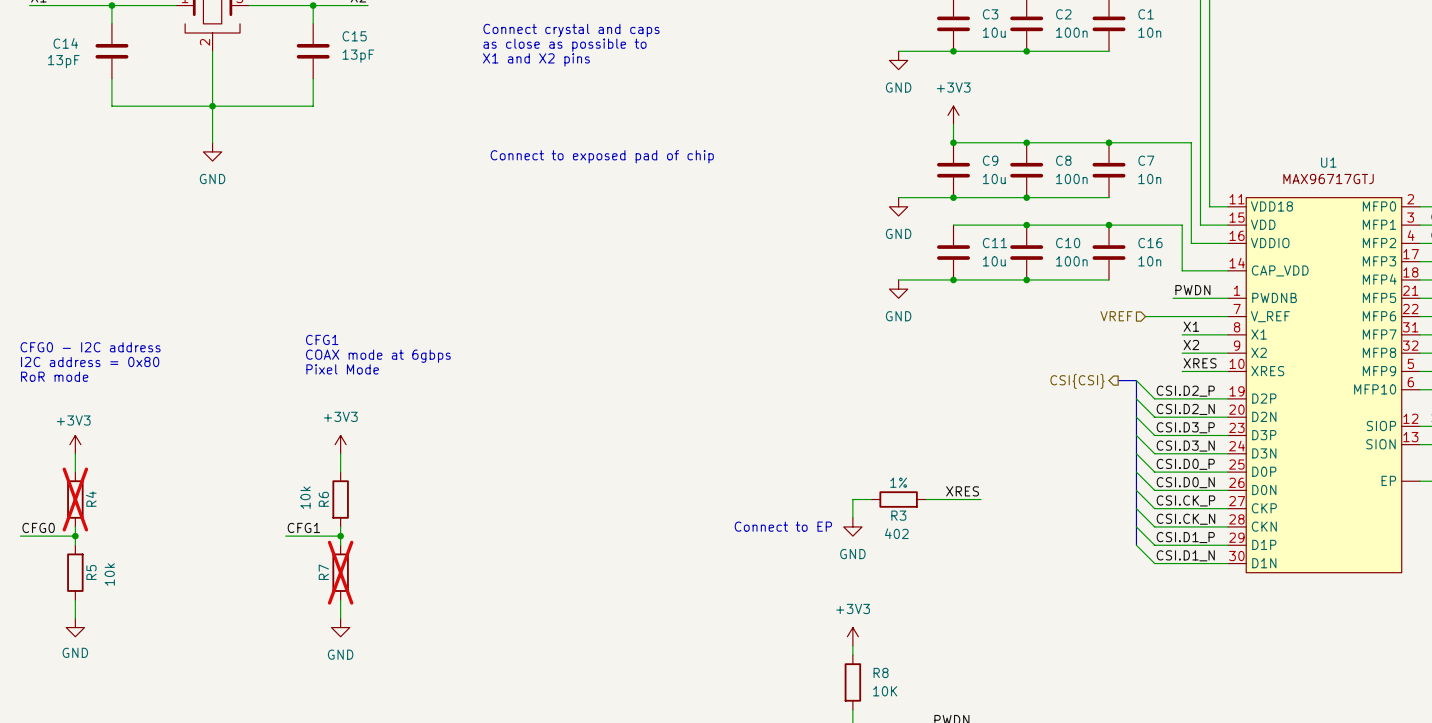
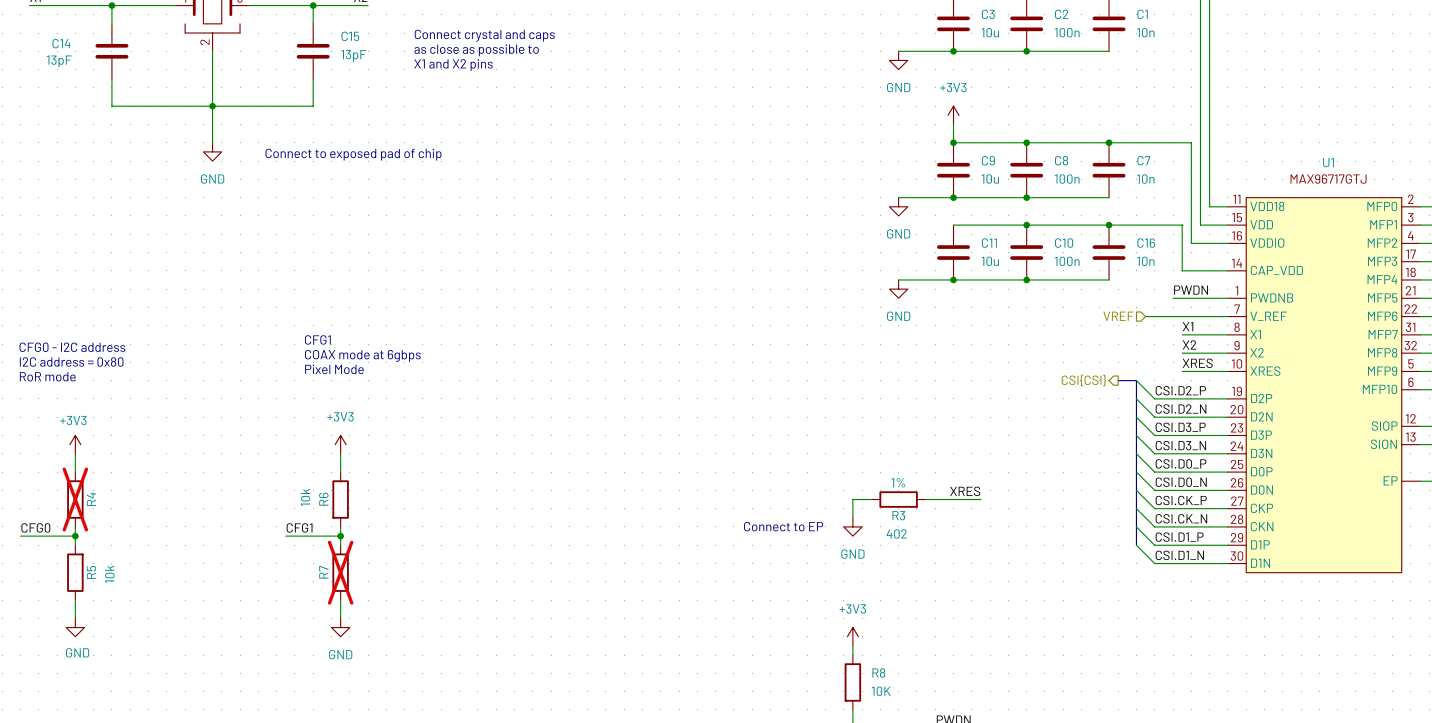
text position: Connect crystal and caps (571, 30) -> Connect crystal and caps (484, 35)
text position: as close as possible to (564, 45) -> as close as possible to (476, 50)
text position: X1 and X2 pins (536, 59) -> X1 and X2 pins (453, 65)
text: none -> Connect to exposed pad of chip (353, 154)
text: Connect to exposed pad of chip (602, 156) -> none

